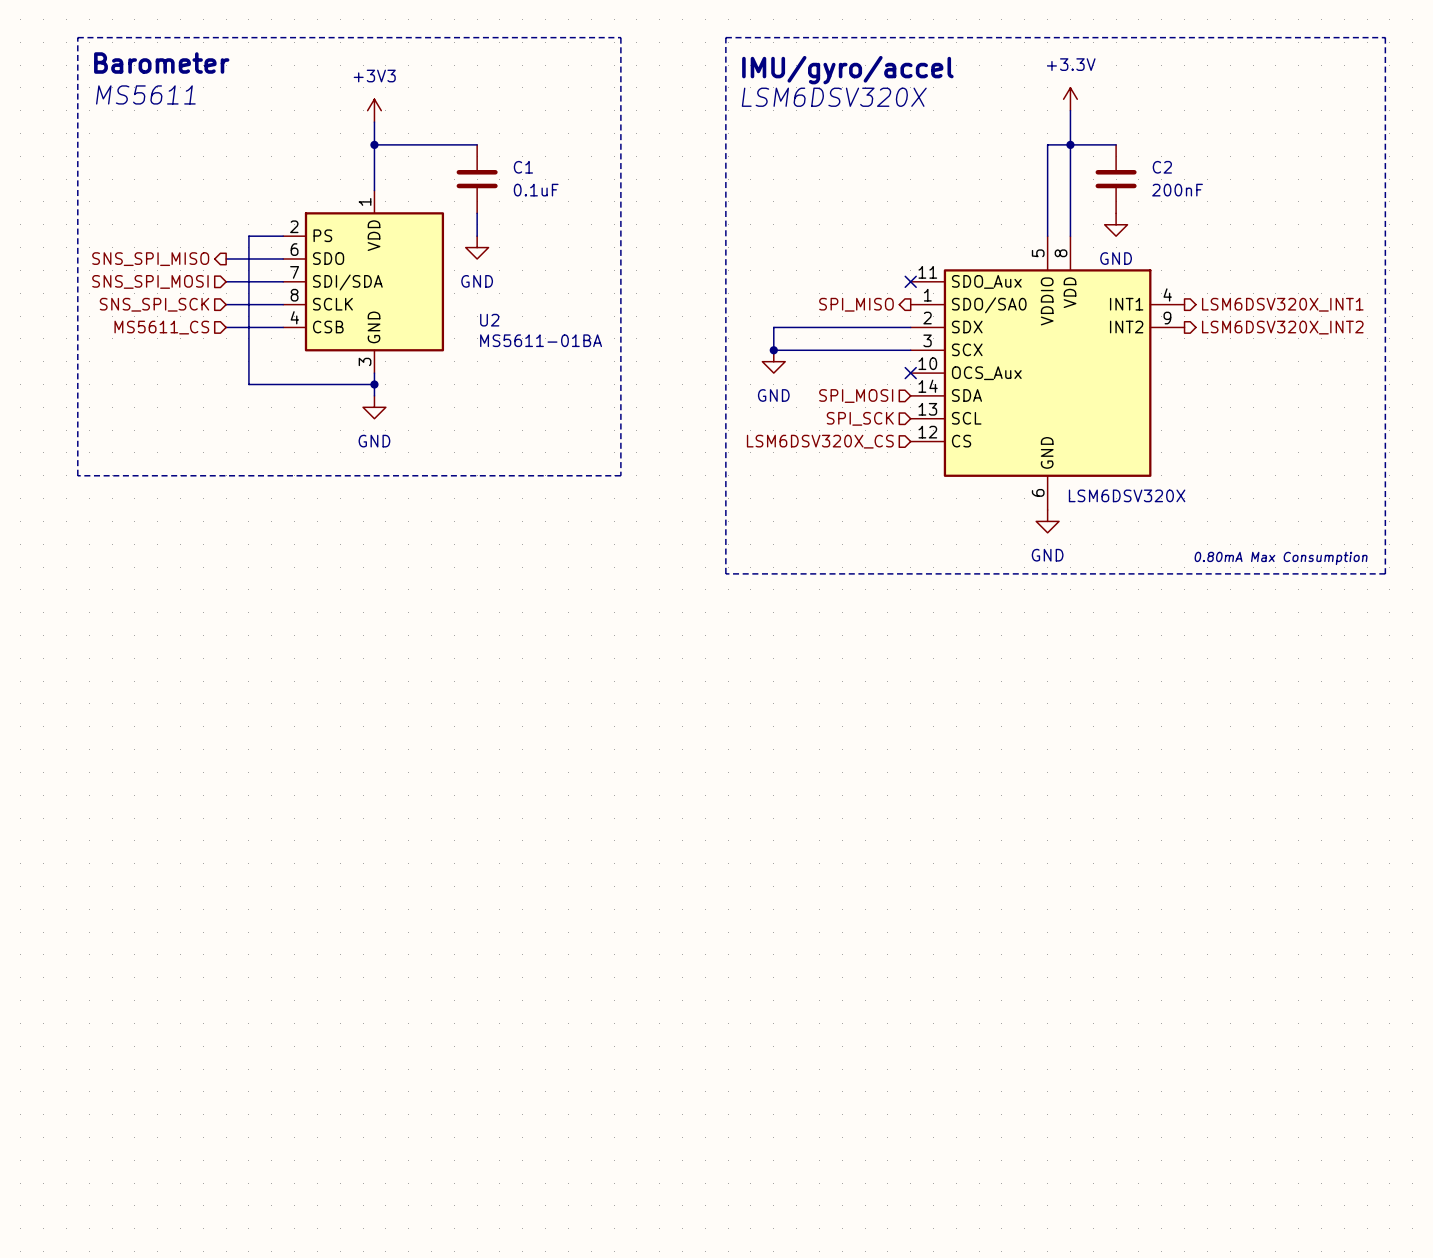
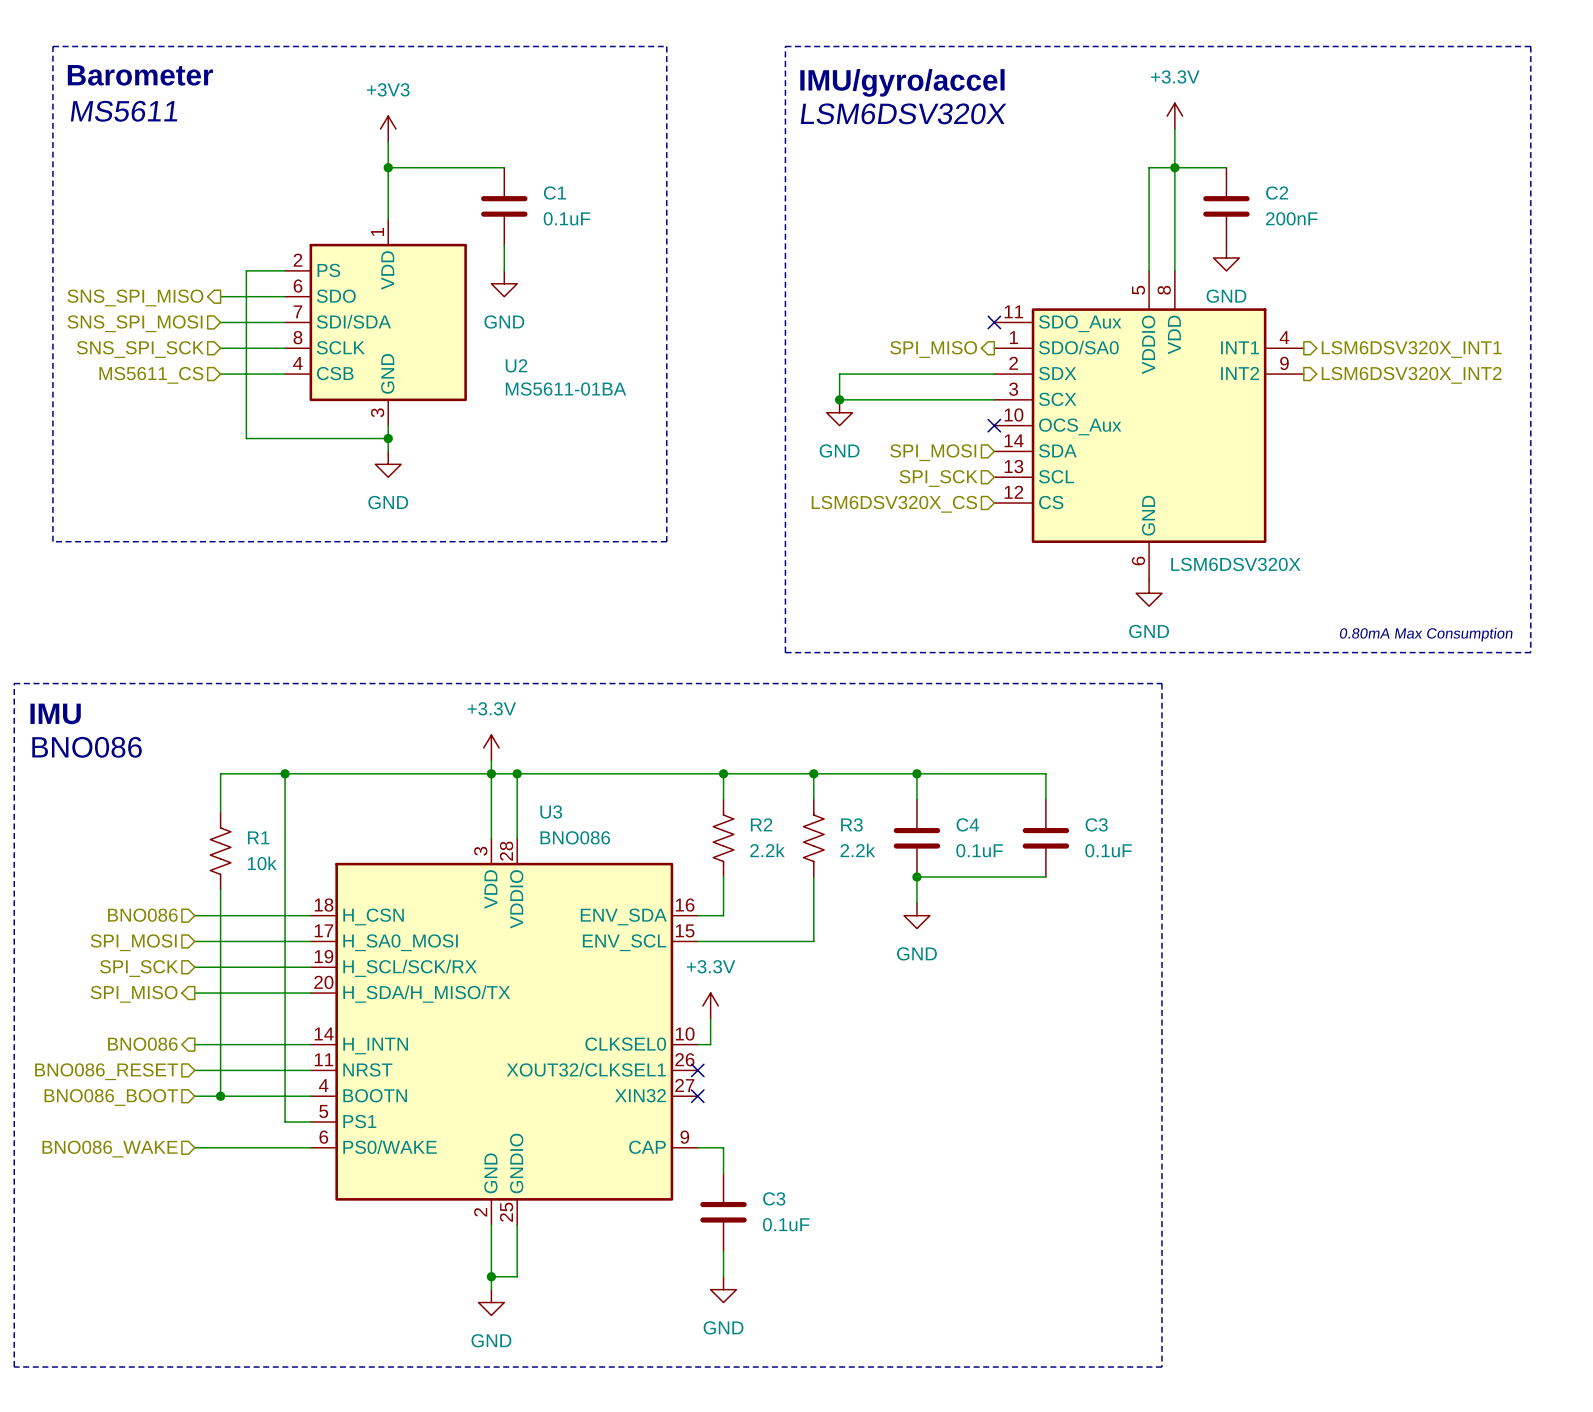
line: none -> (14, 683) (1161, 683) (1161, 1367) (14, 1367) (14, 683)
text: none -> IMU (55, 713)
text: none -> BNO086 (87, 747)
power symbol: none -> +3.3V (491, 748)
wire: none -> (491, 760) (491, 838)
wire: none -> (285, 773) (285, 1122) (310, 1122)
junction: none -> (285, 773)
junction: none -> (491, 773)
wire: none -> (517, 773) (517, 838)
junction: none -> (517, 773)
wire: none -> (723, 773) (723, 799)
junction: none -> (723, 773)
wire: none -> (813, 773) (813, 799)
junction: none -> (813, 773)
wire: none -> (916, 773) (916, 799)
junction: none -> (916, 773)
wire: none -> (1045, 799) (1045, 773) (220, 773) (220, 812)
R2: none -> 2.2k (723, 838)
R3: none -> 2.2k (813, 838)
C4: none -> 0.1uF (916, 838)
C3: none -> 0.1uF (1045, 838)
R1: none -> 10k (220, 851)
wire: none -> (723, 876) (723, 915) (697, 915)
wire: none -> (813, 876) (813, 941) (697, 941)
junction: none -> (916, 876)
wire: none -> (1045, 876) (916, 876) (916, 902)
wire: none -> (220, 889) (220, 1096)
hierarchical label: none -> BNO086 (142, 915)
wire: none -> (194, 915) (310, 915)
power symbol: none -> GND (916, 915)
hierarchical label: none -> SPI_MOSI (133, 942)
wire: none -> (194, 941) (310, 941)
hierarchical label: none -> SPI_SCK (139, 968)
wire: none -> (194, 967) (310, 967)
hierarchical label: none -> SPI_MISO (134, 994)
wire: none -> (194, 993) (310, 993)
power symbol: none -> +3.3V (710, 1005)
wire: none -> (710, 1018) (710, 1044) (697, 1044)
U3: none -> BNO086 (504, 1031)
hierarchical label: none -> BNO086 (142, 1044)
wire: none -> (194, 1044) (310, 1044)
hierarchical label: none -> BNO086_RESET (106, 1071)
wire: none -> (194, 1070) (310, 1070)
no-connect mark: none -> (697, 1070)
hierarchical label: none -> BNO086_BOOT (111, 1097)
wire: none -> (194, 1096) (310, 1096)
junction: none -> (220, 1096)
no-connect mark: none -> (697, 1096)
hierarchical label: none -> BNO086_WAKE (110, 1149)
wire: none -> (194, 1147) (310, 1147)
wire: none -> (697, 1147) (723, 1147) (723, 1173)
C3: none -> 0.1uF (723, 1212)
wire: none -> (491, 1225) (491, 1289)
wire: none -> (517, 1225) (517, 1276) (491, 1276)
wire: none -> (723, 1250) (723, 1276)
junction: none -> (491, 1276)
power symbol: none -> GND (723, 1289)
power symbol: none -> GND (491, 1302)

